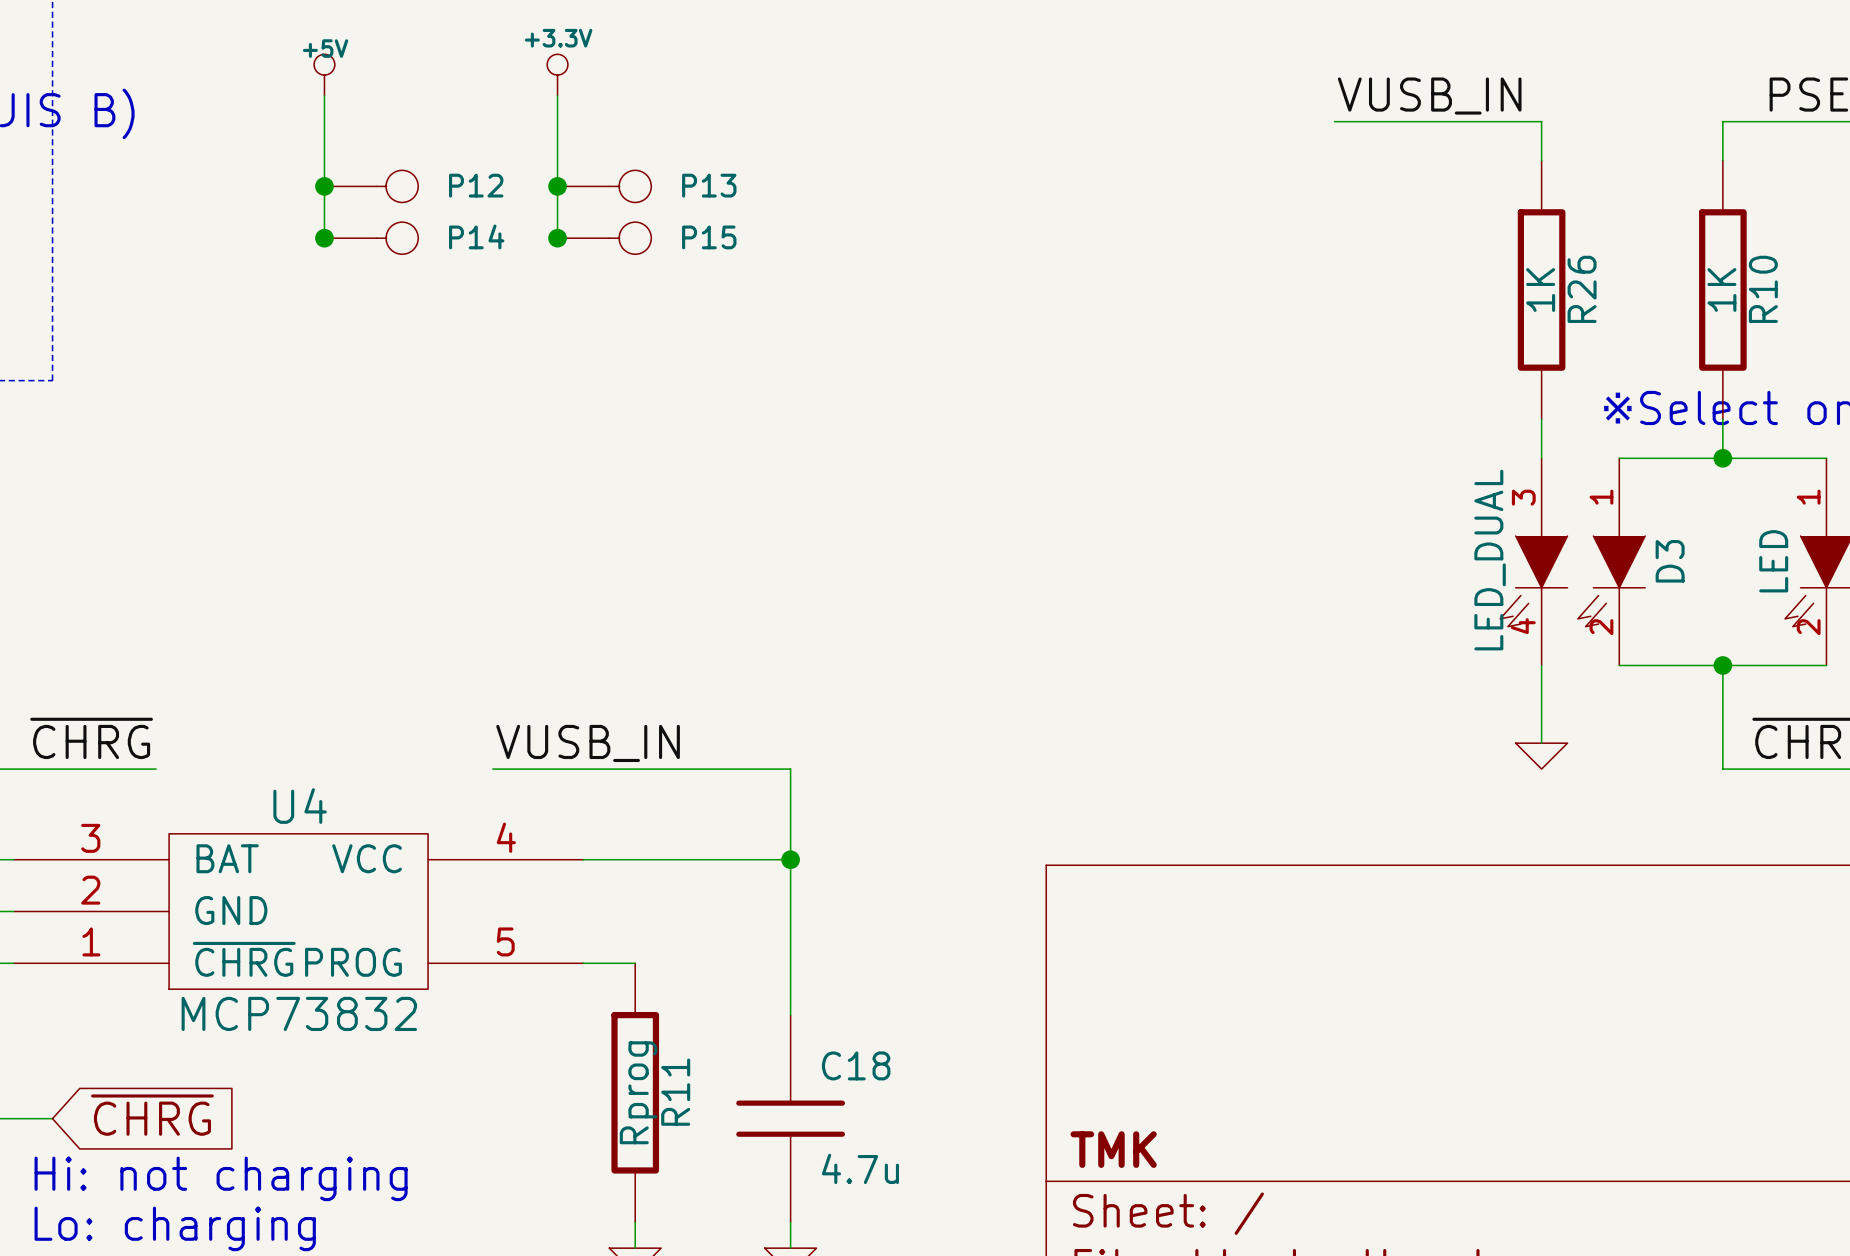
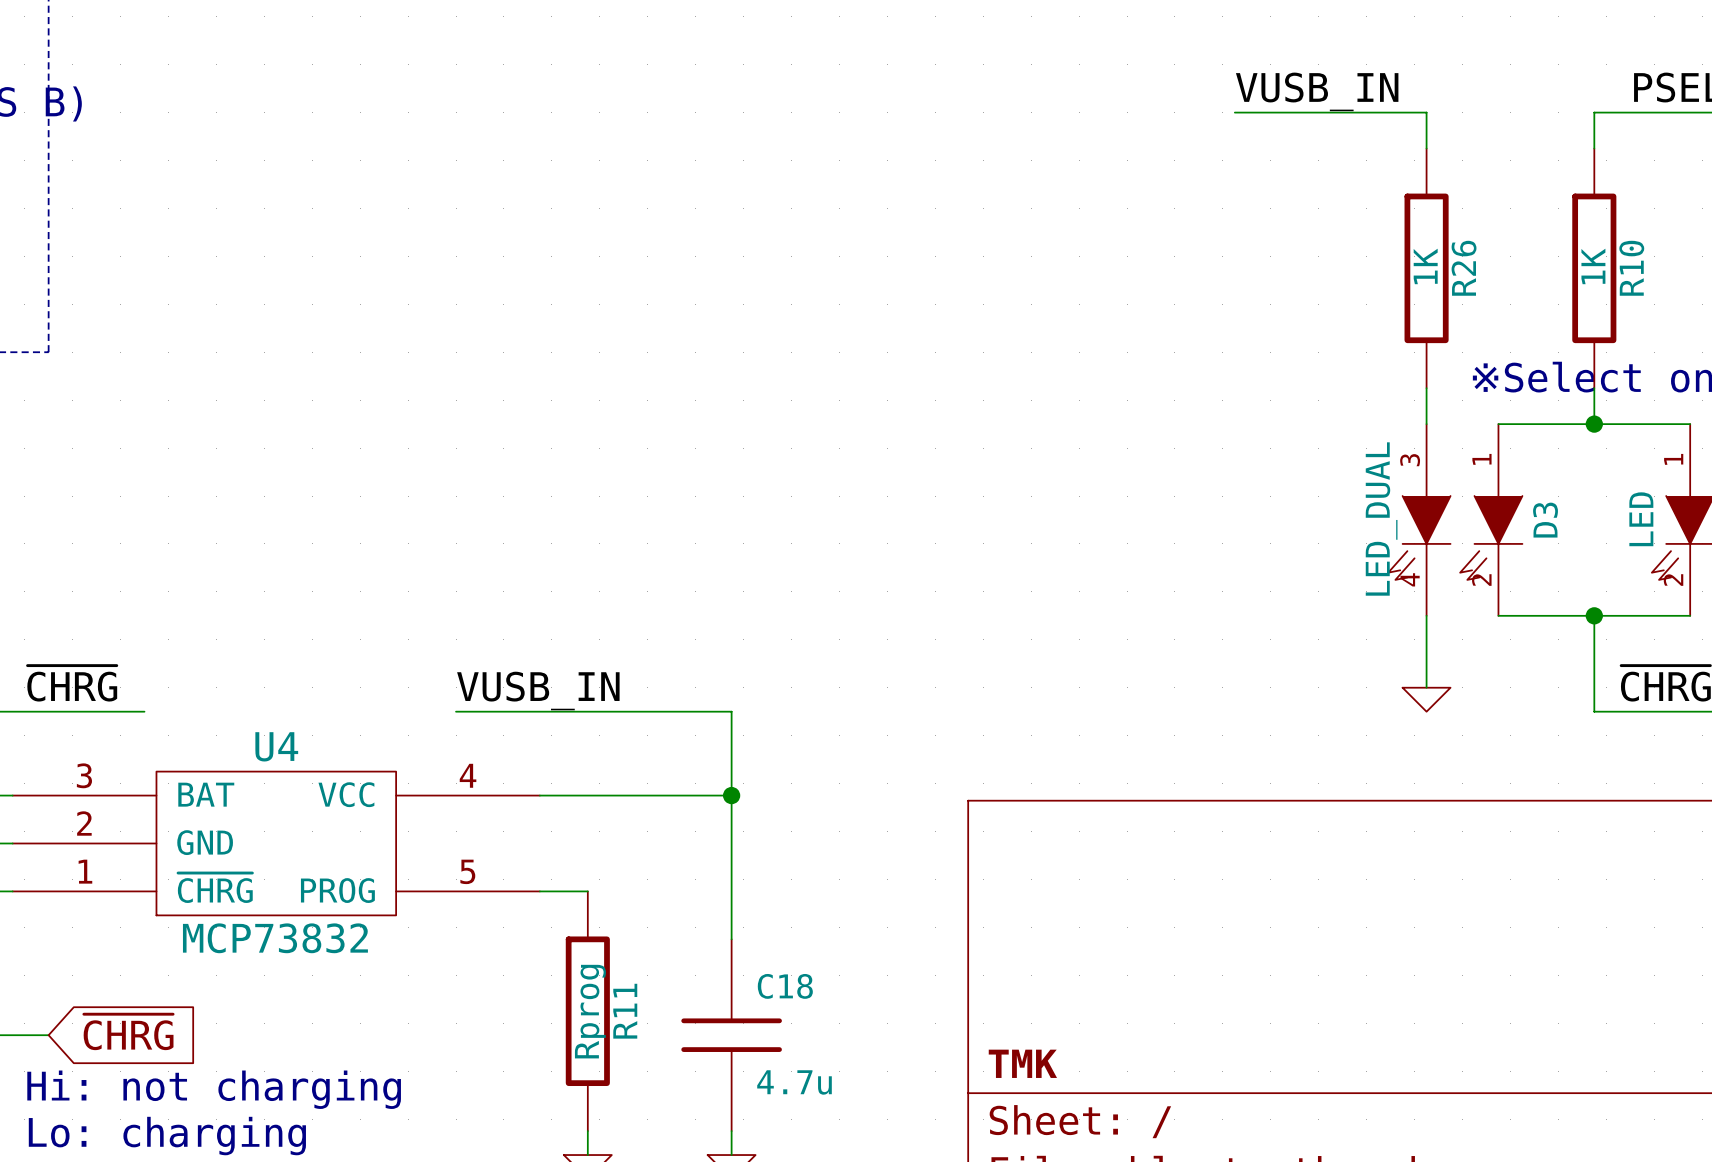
power symbol: +5V (324, 75) -> none
power symbol: +3.3V (557, 75) -> none
wire: (324, 95) (324, 238) -> none
wire: (557, 95) (557, 238) -> none
junction: (324, 186) -> none
P12: (371, 186) -> none
junction: (557, 186) -> none
P13: (604, 186) -> none
junction: (324, 238) -> none
P14: (371, 238) -> none
junction: (557, 238) -> none
P15: (604, 238) -> none

